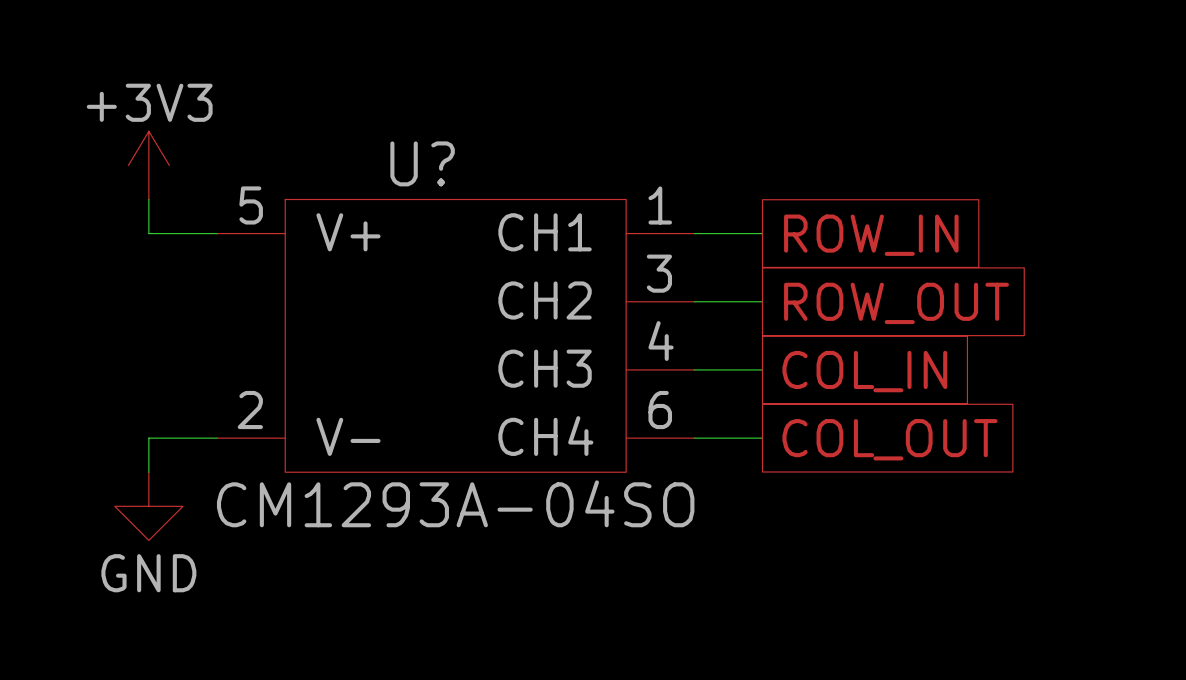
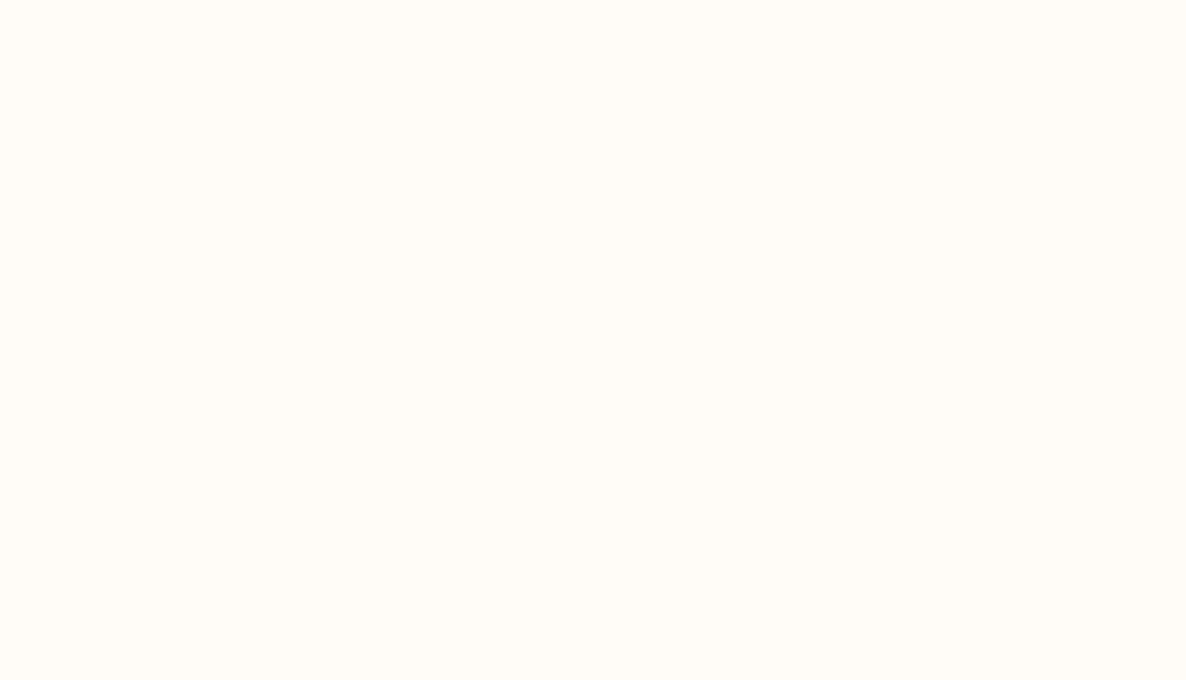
power symbol: +3V3 (148, 165) -> none
wire: (148, 199) (148, 233) (217, 233) -> none
wire: (694, 233) (762, 233) -> none
global label: ROW_IN (871, 235) -> none
wire: (694, 301) (762, 301) -> none
global label: ROW_OUT (896, 303) -> none
U?: CM1293A-04SO (455, 335) -> none
wire: (694, 369) (762, 369) -> none
global label: COL_IN (864, 371) -> none
wire: (217, 438) (148, 438) (148, 472) -> none
wire: (694, 438) (762, 438) -> none
global label: COL_OUT (890, 439) -> none
power symbol: GND (148, 506) -> none

